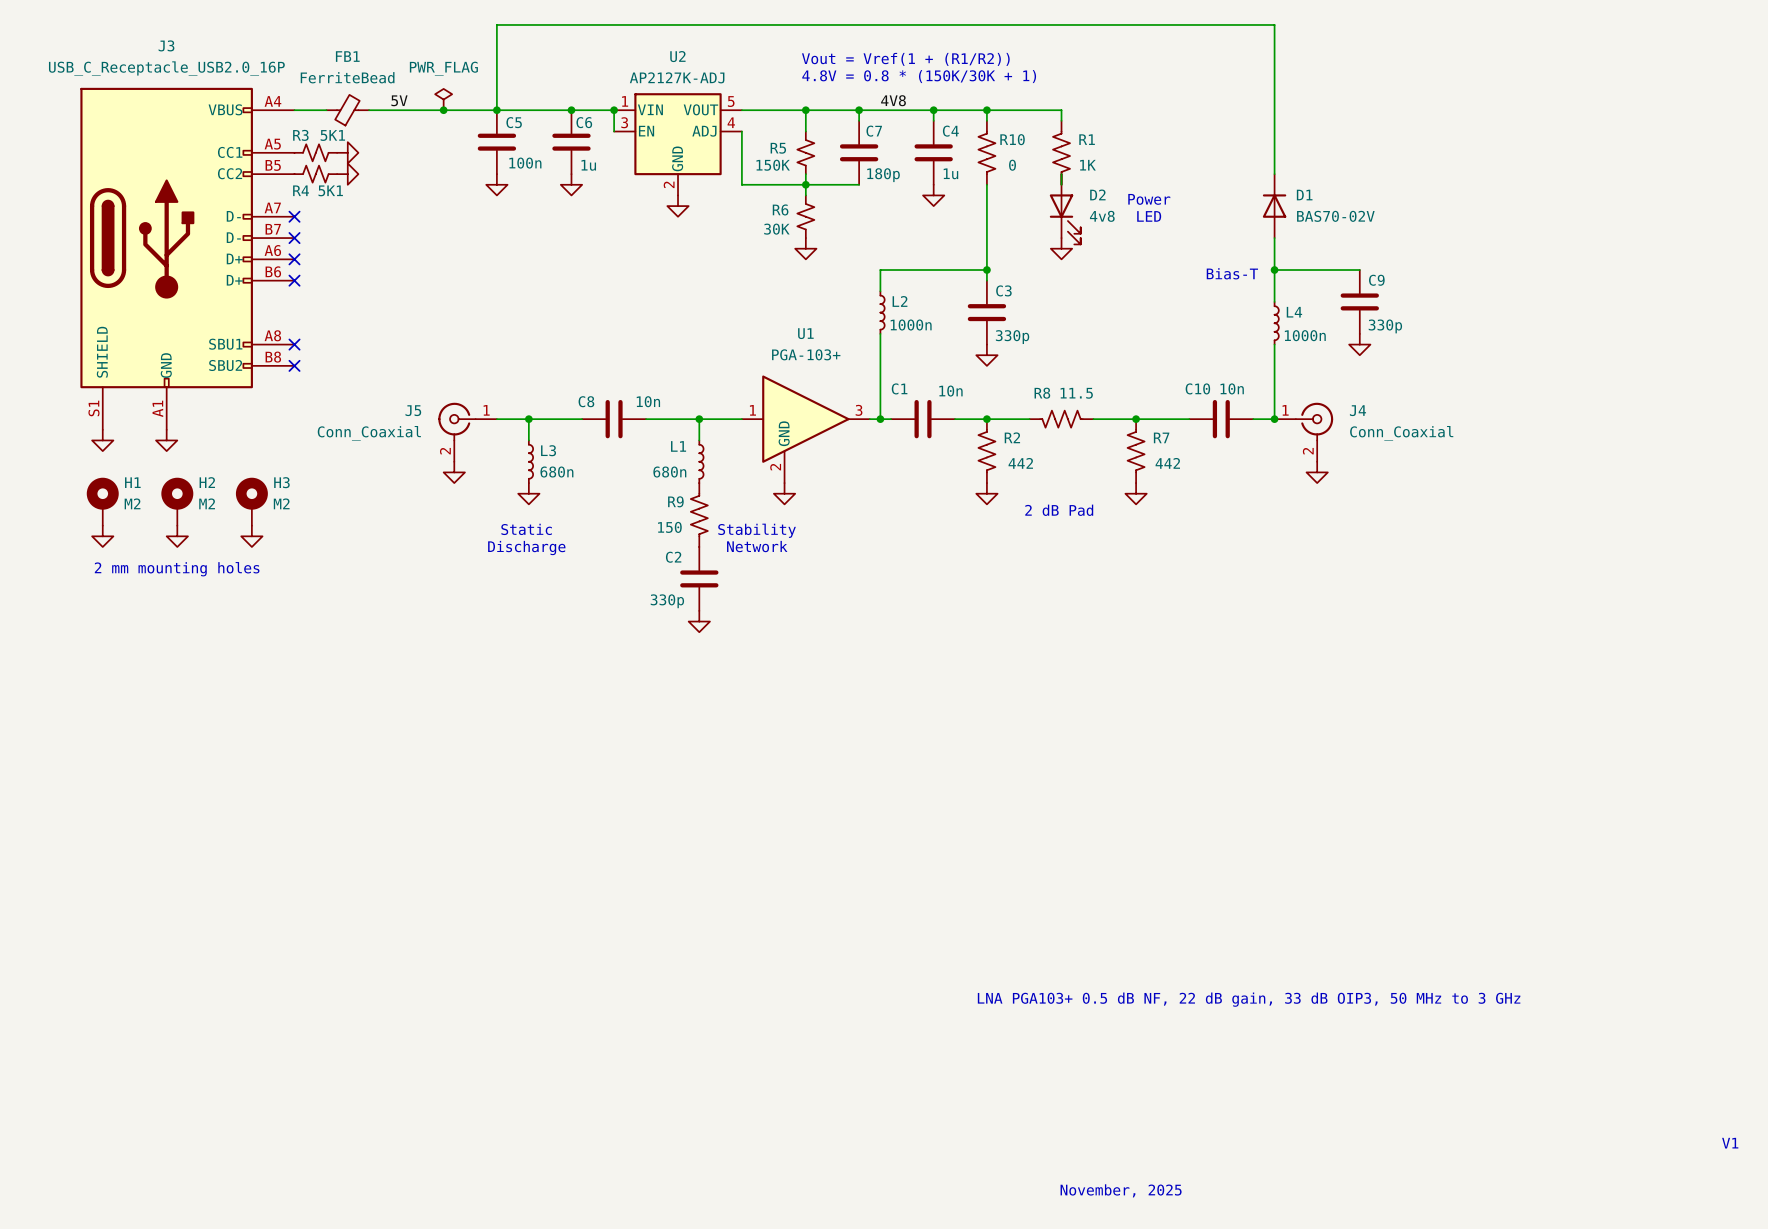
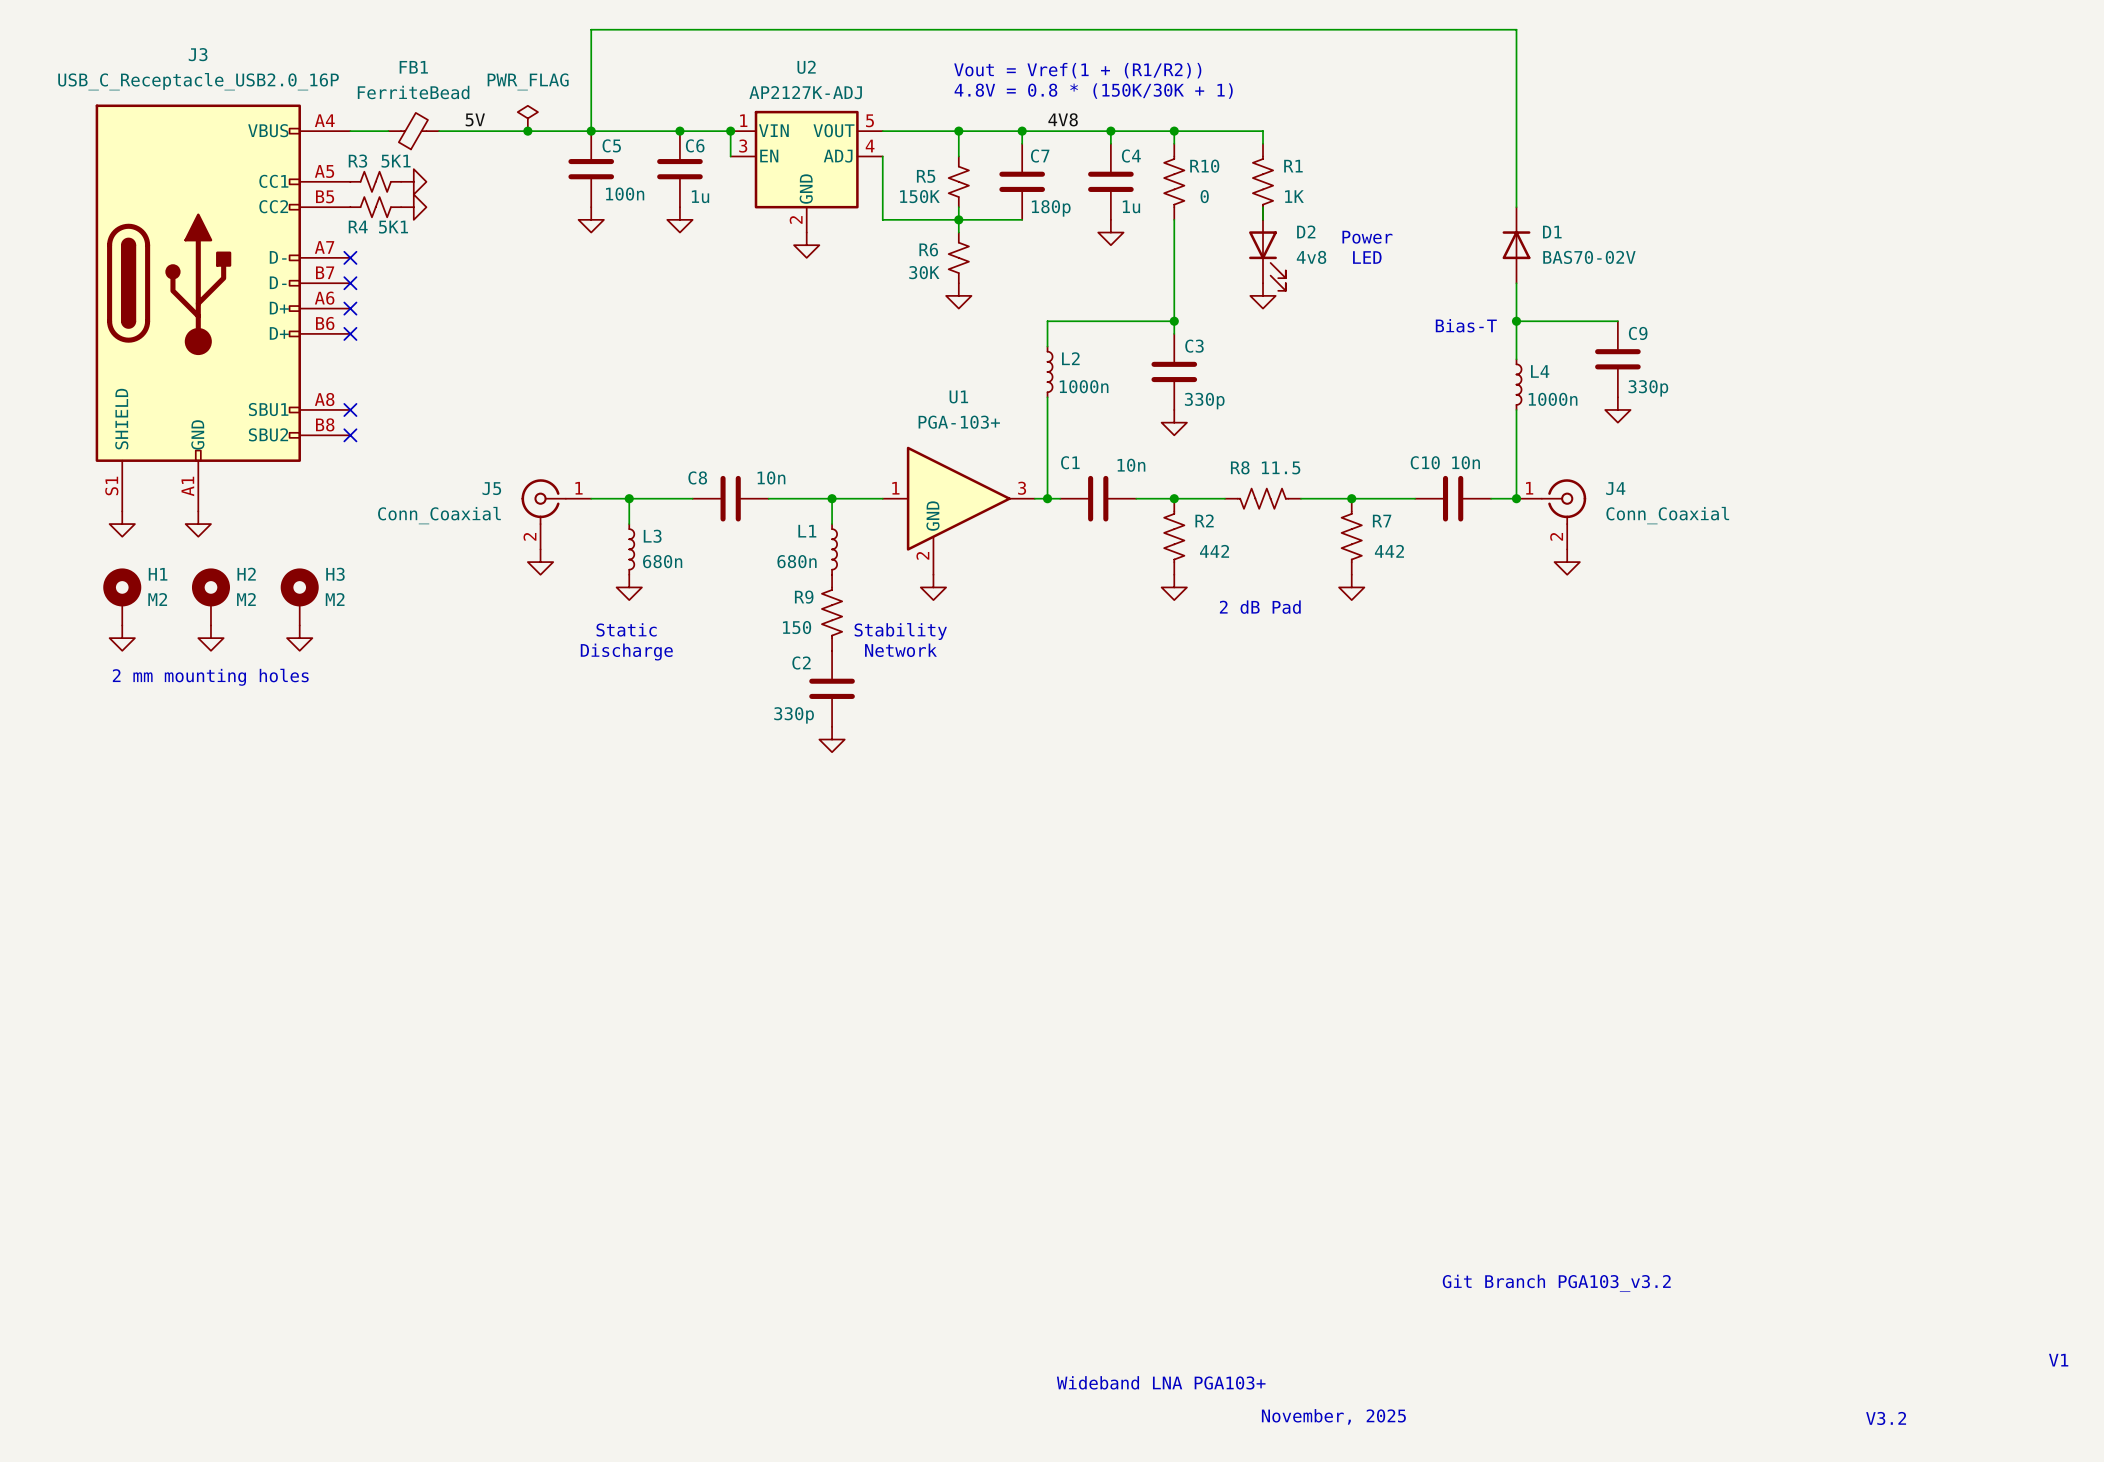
text: LNA PGA103+ 0.5 dB NF, 22 dB gain, 33 dB OIP3, 50 MHz to 3 GHz (1249, 999) -> none
text: none -> Git Branch PGA103_v3.2 (1556, 1283)
text: none -> Wideband LNA PGA103+ (1161, 1382)
text: none -> V3.2 (1886, 1418)

